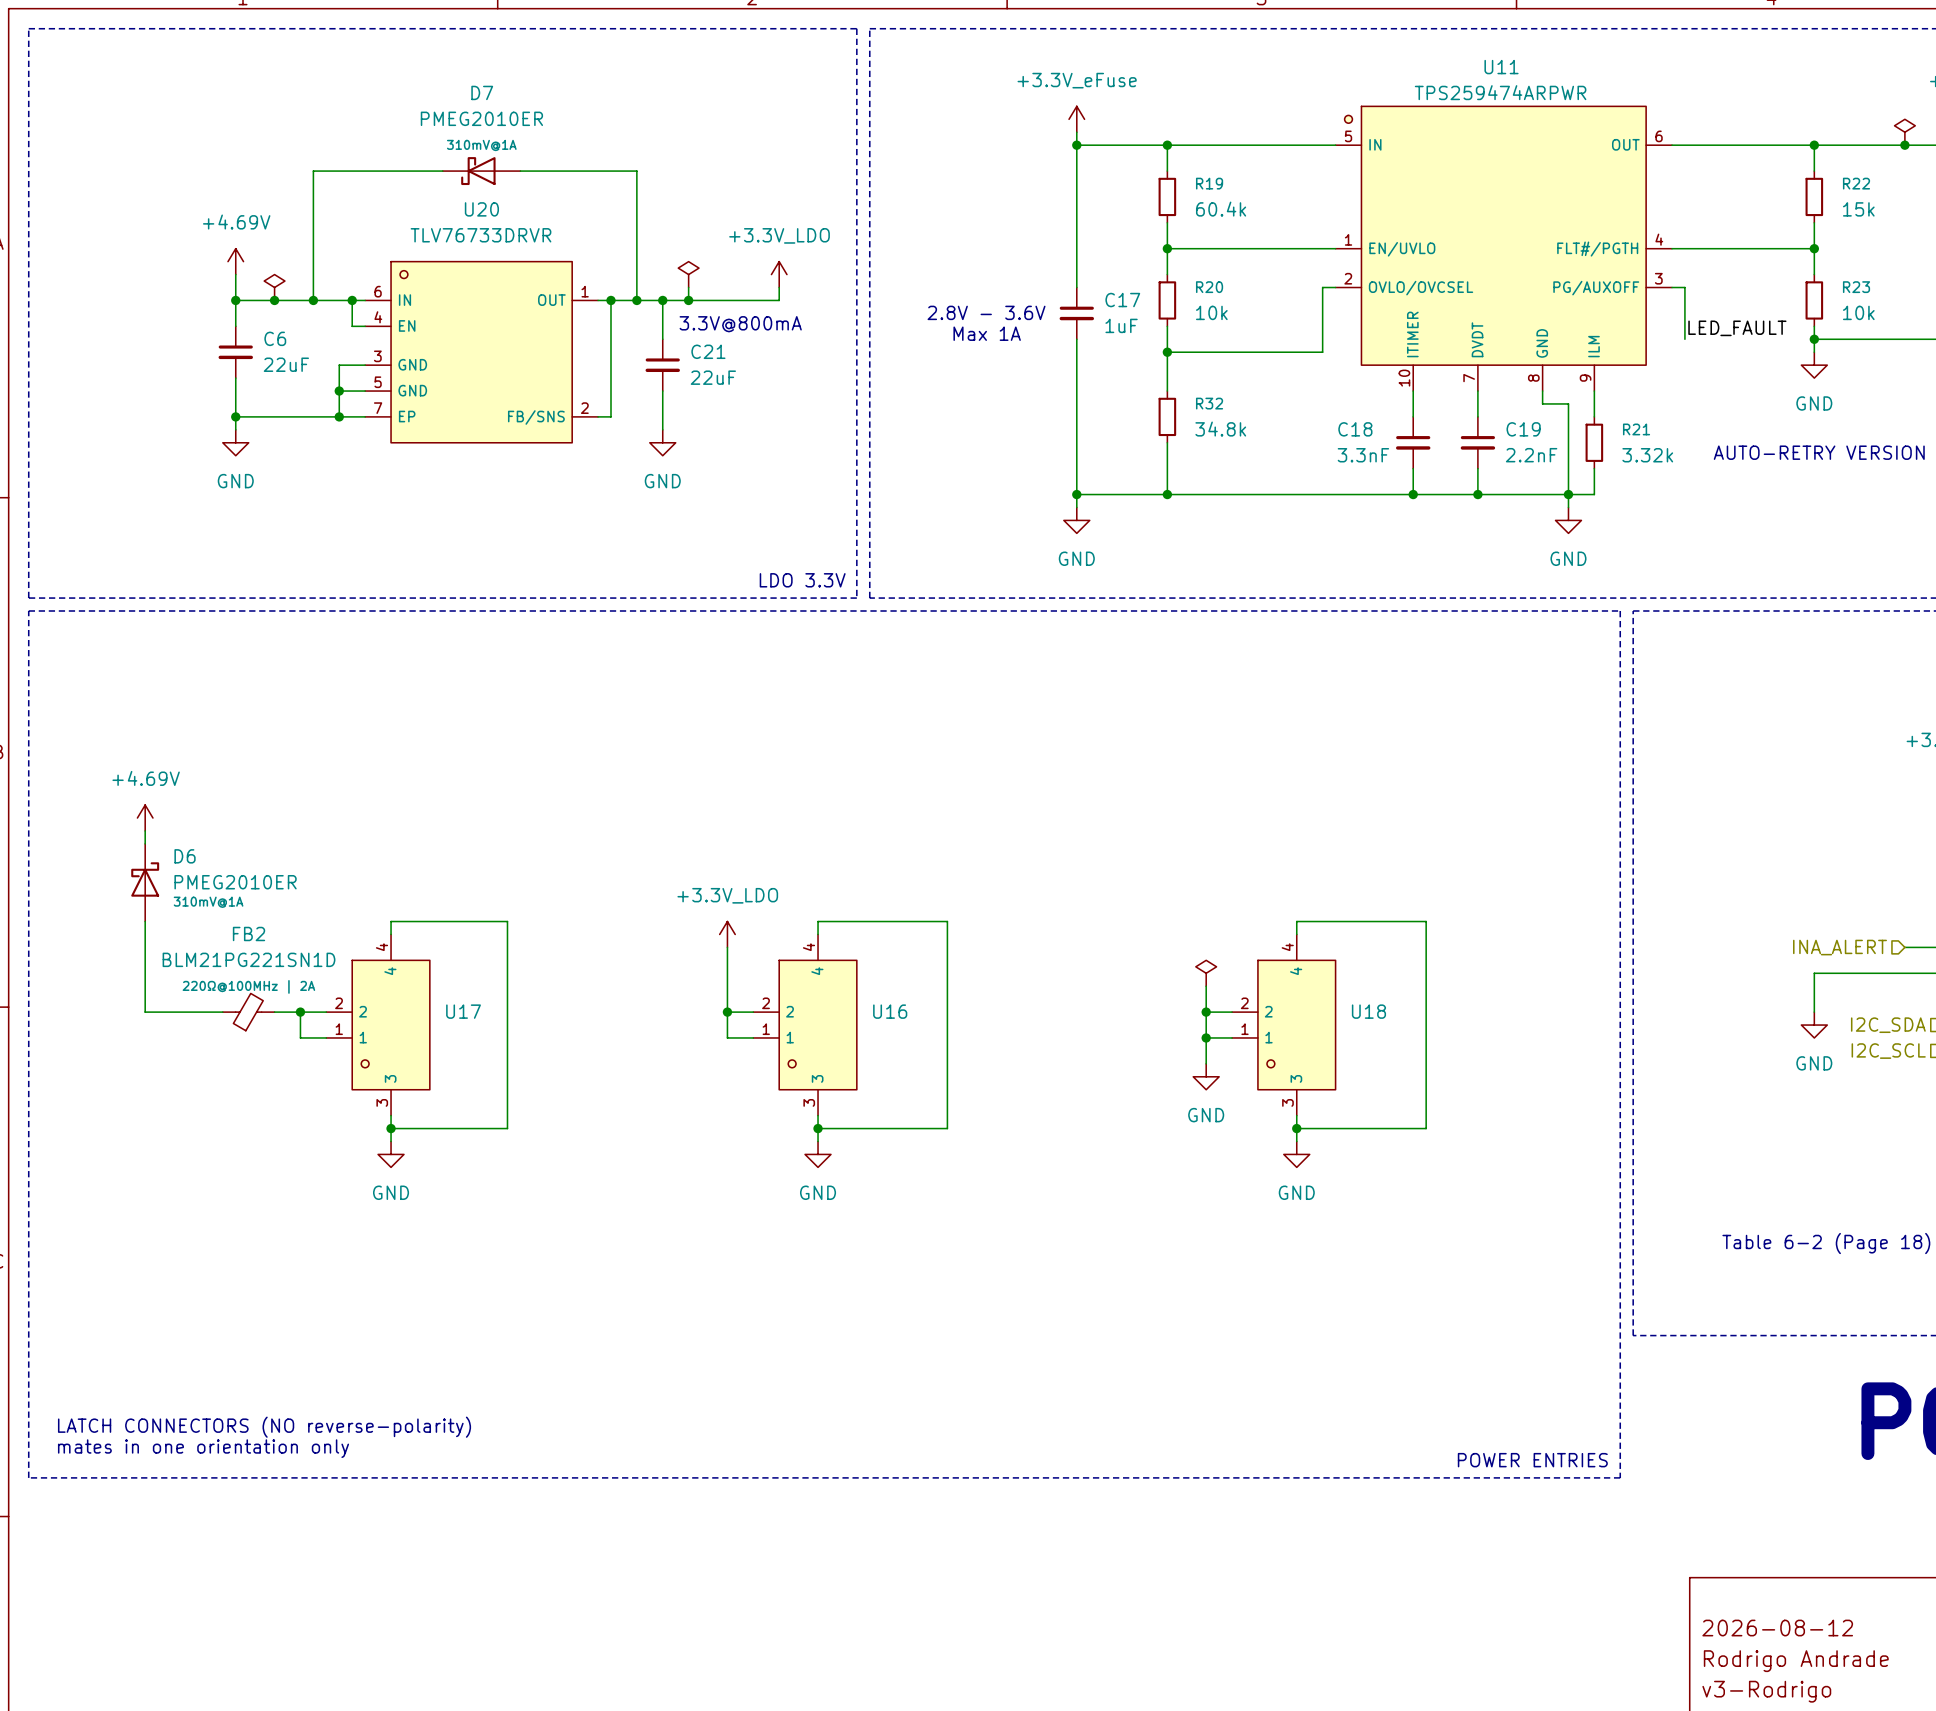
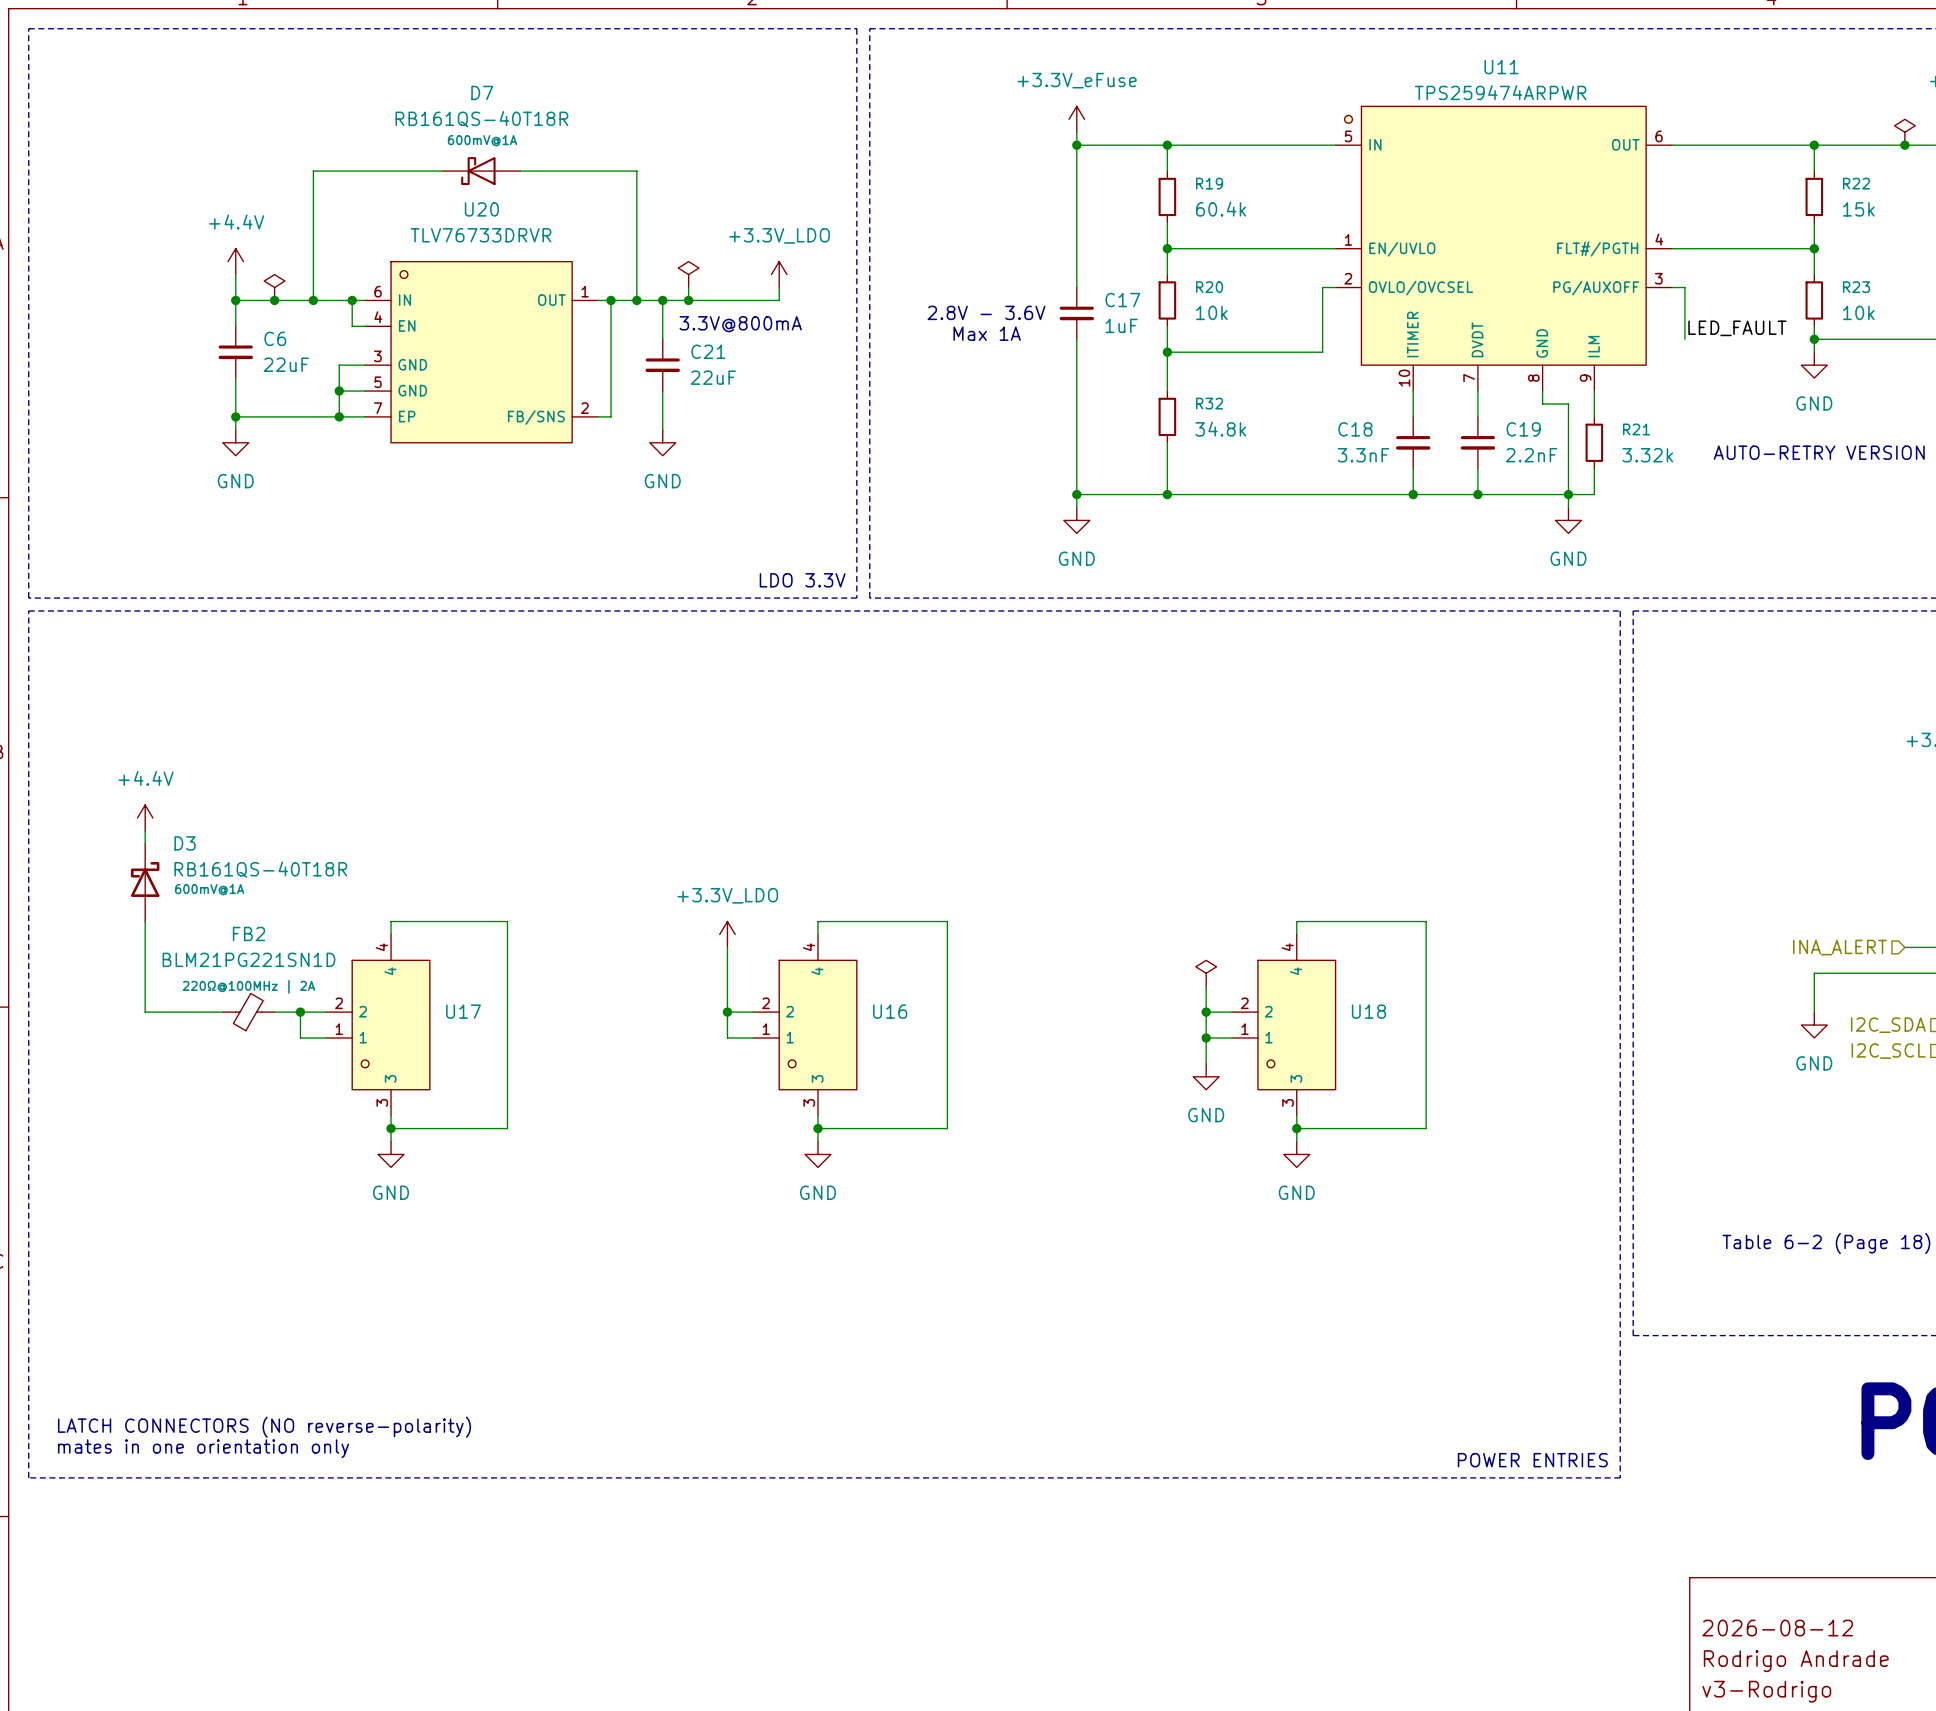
D7 value: PMEG2010ER (481, 118) -> RB161QS-40T18R (481, 119)
D7 text: 310mV@1A (481, 145) -> 600mV@1A (482, 140)
power symbol: +4.69V (235, 261) -> +4.4V (235, 261)
power symbol: +4.69V (145, 818) -> +4.4V (145, 818)
D6: PMEG2010ER (145, 882) -> none
D3: none -> RB161QS-40T18R (145, 882)

